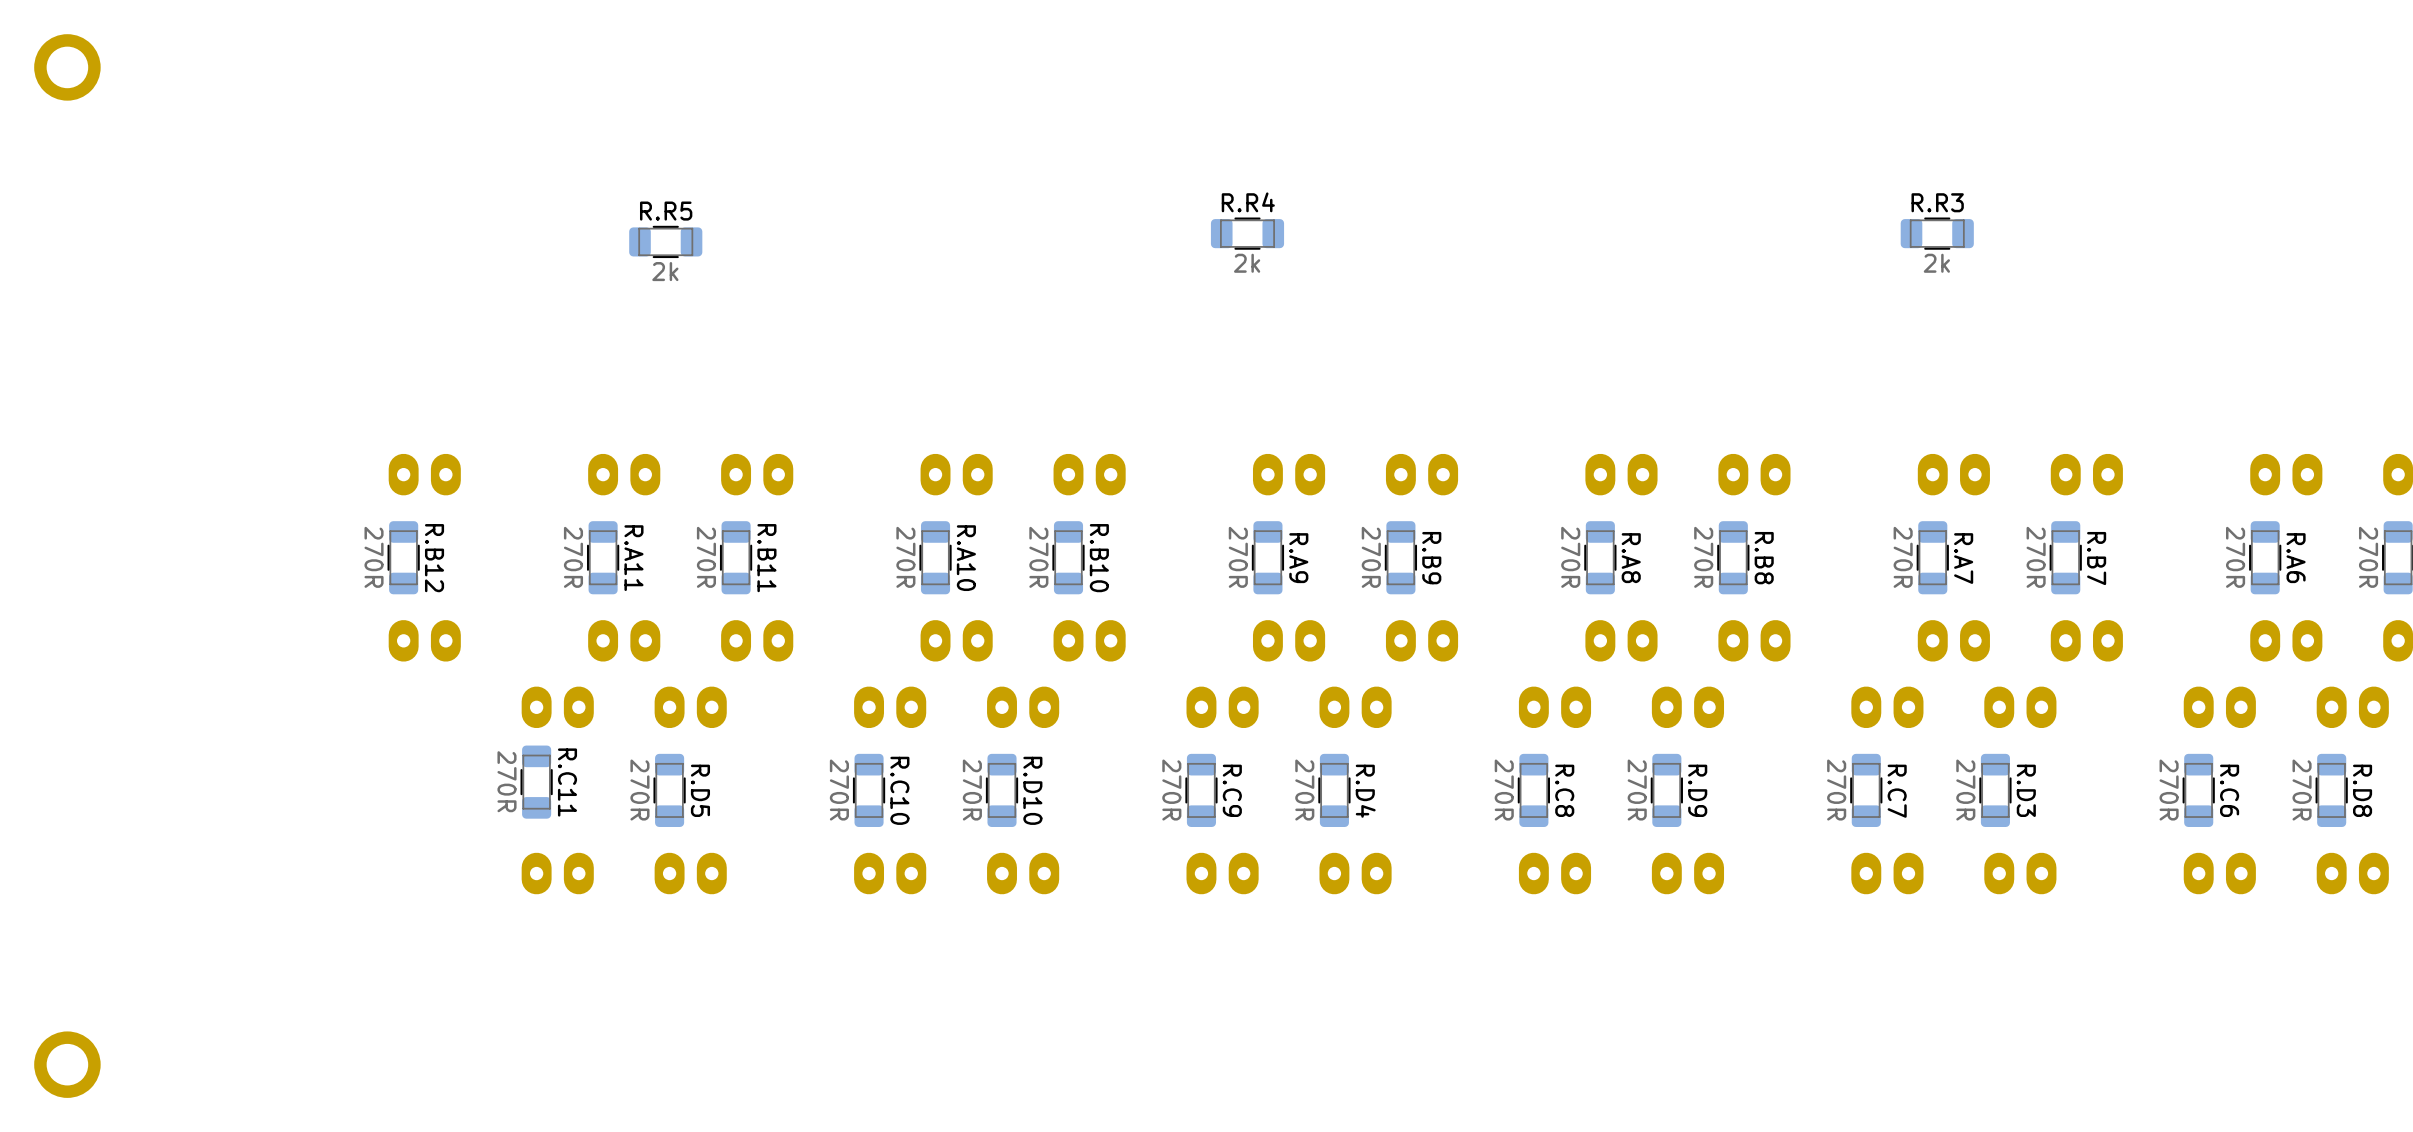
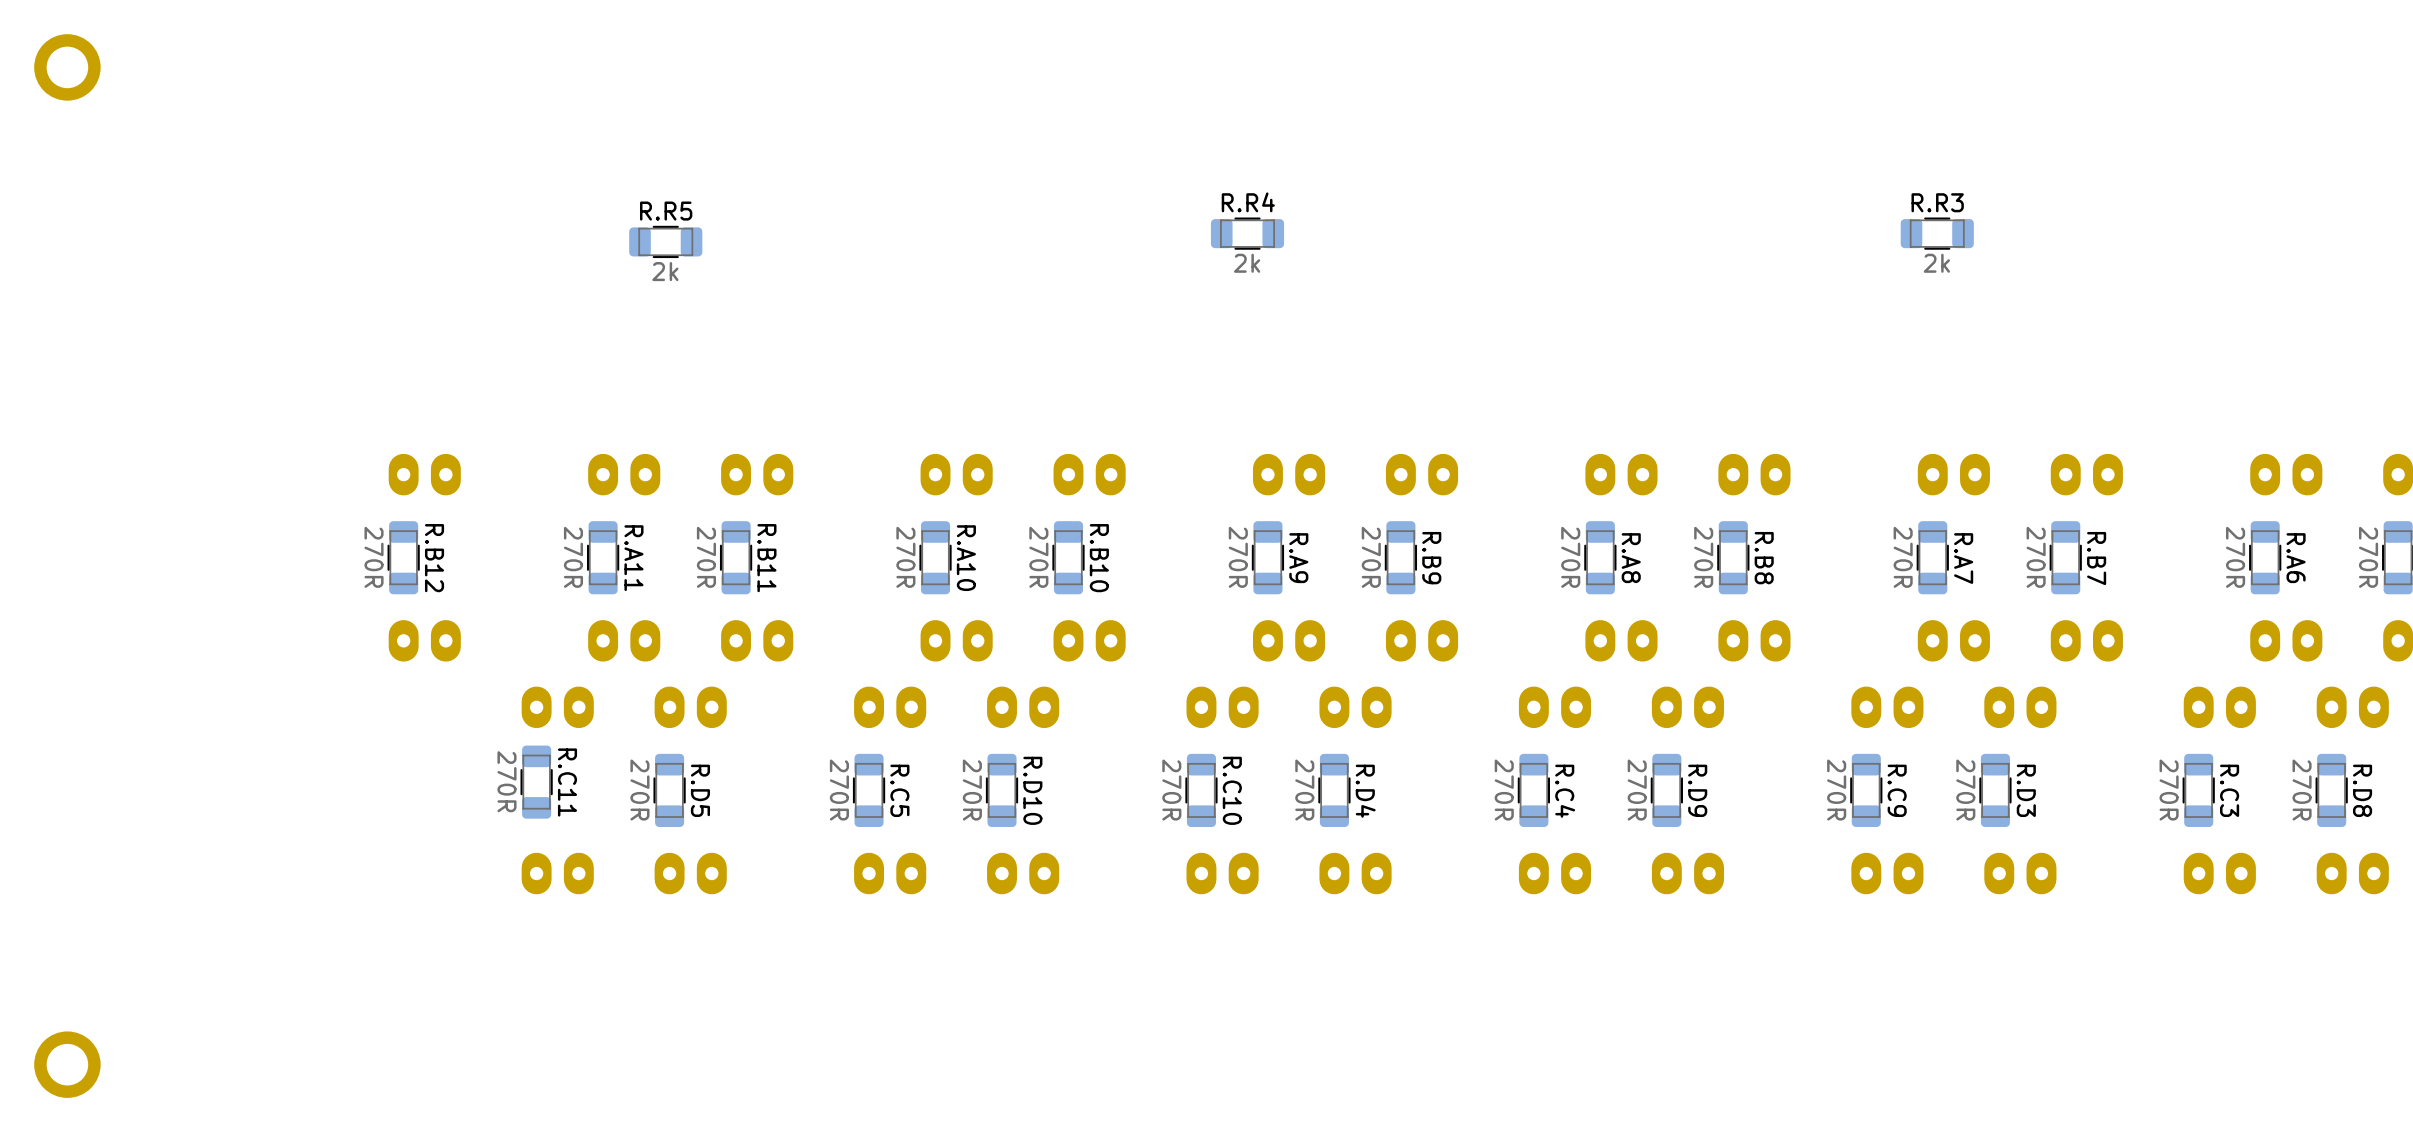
R.C10 name: R.C10 (899, 790) -> R.C5 (899, 790)
R.C9 name: R.C9 (1232, 790) -> R.C10 (1232, 790)
R.C8 name: R.C8 (1564, 790) -> R.C4 (1565, 791)
R.C6 name: R.C6 (2229, 790) -> R.C3 (2229, 790)
R.C7 name: R.C7 (1897, 791) -> R.C9 (1897, 790)

